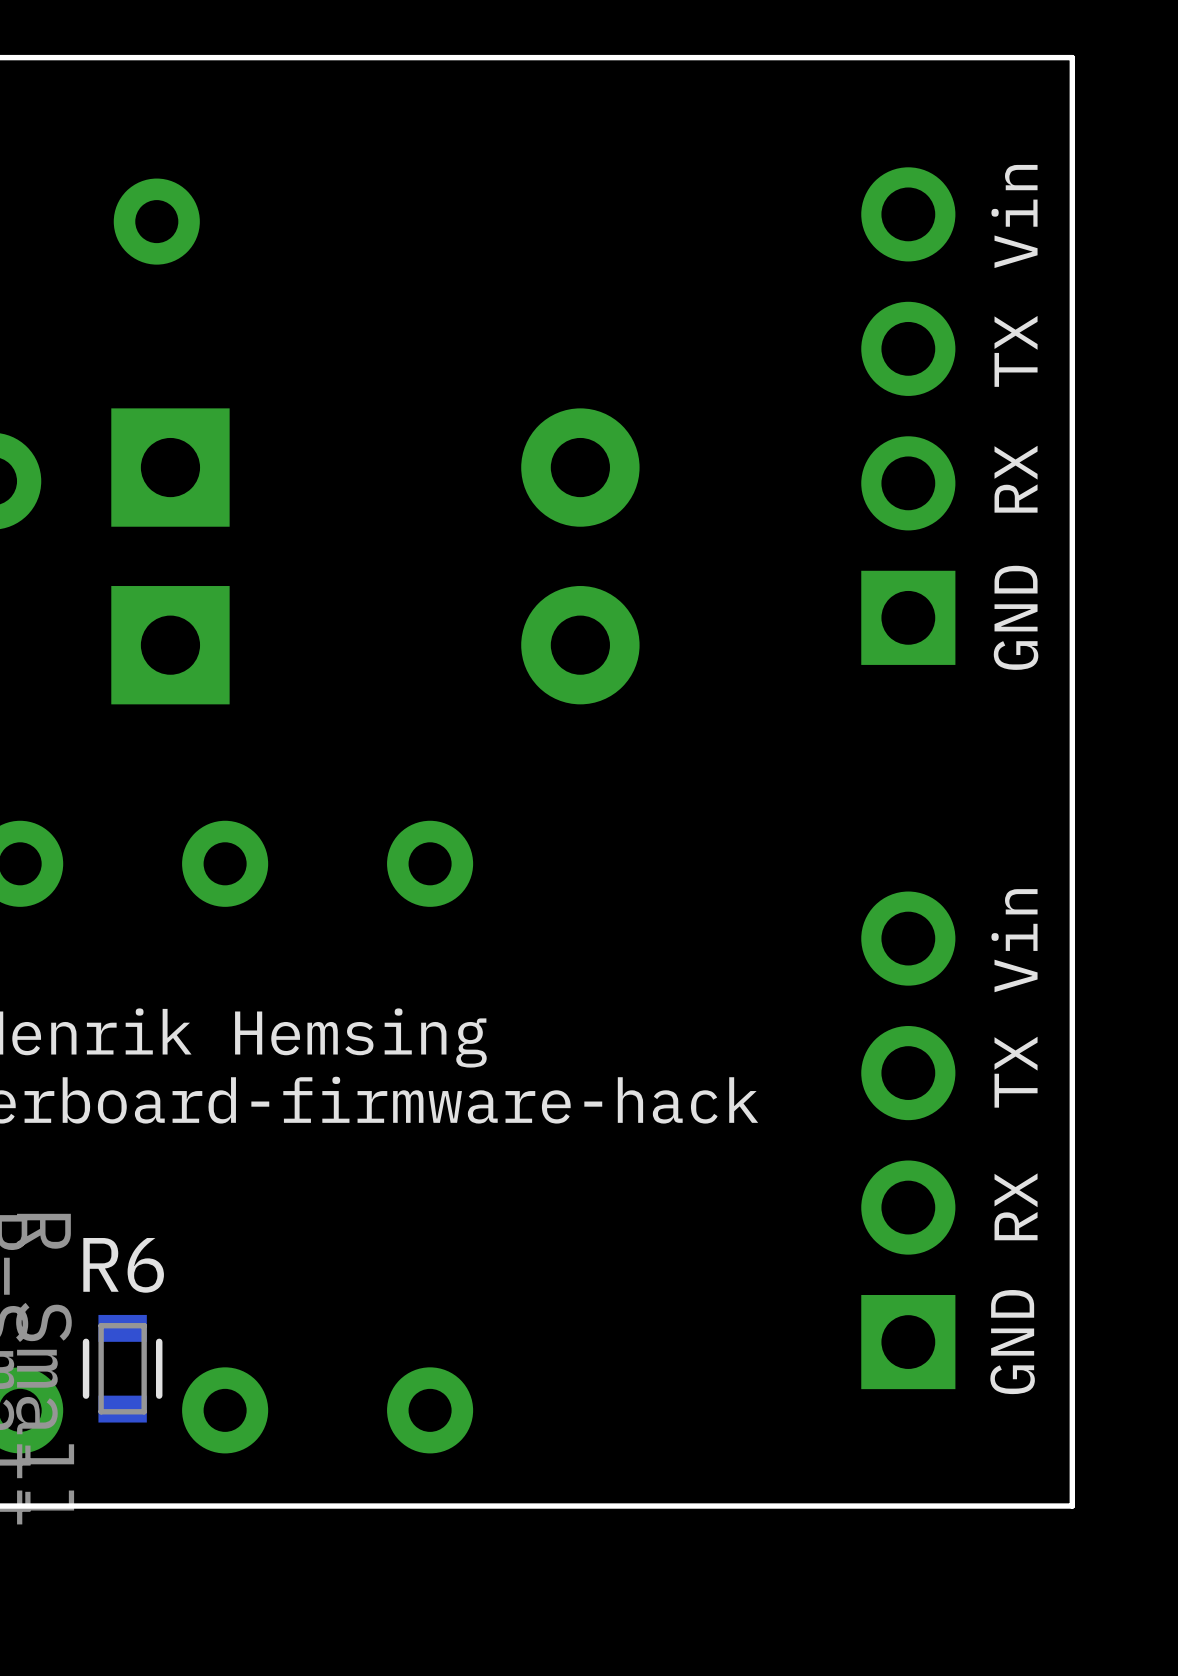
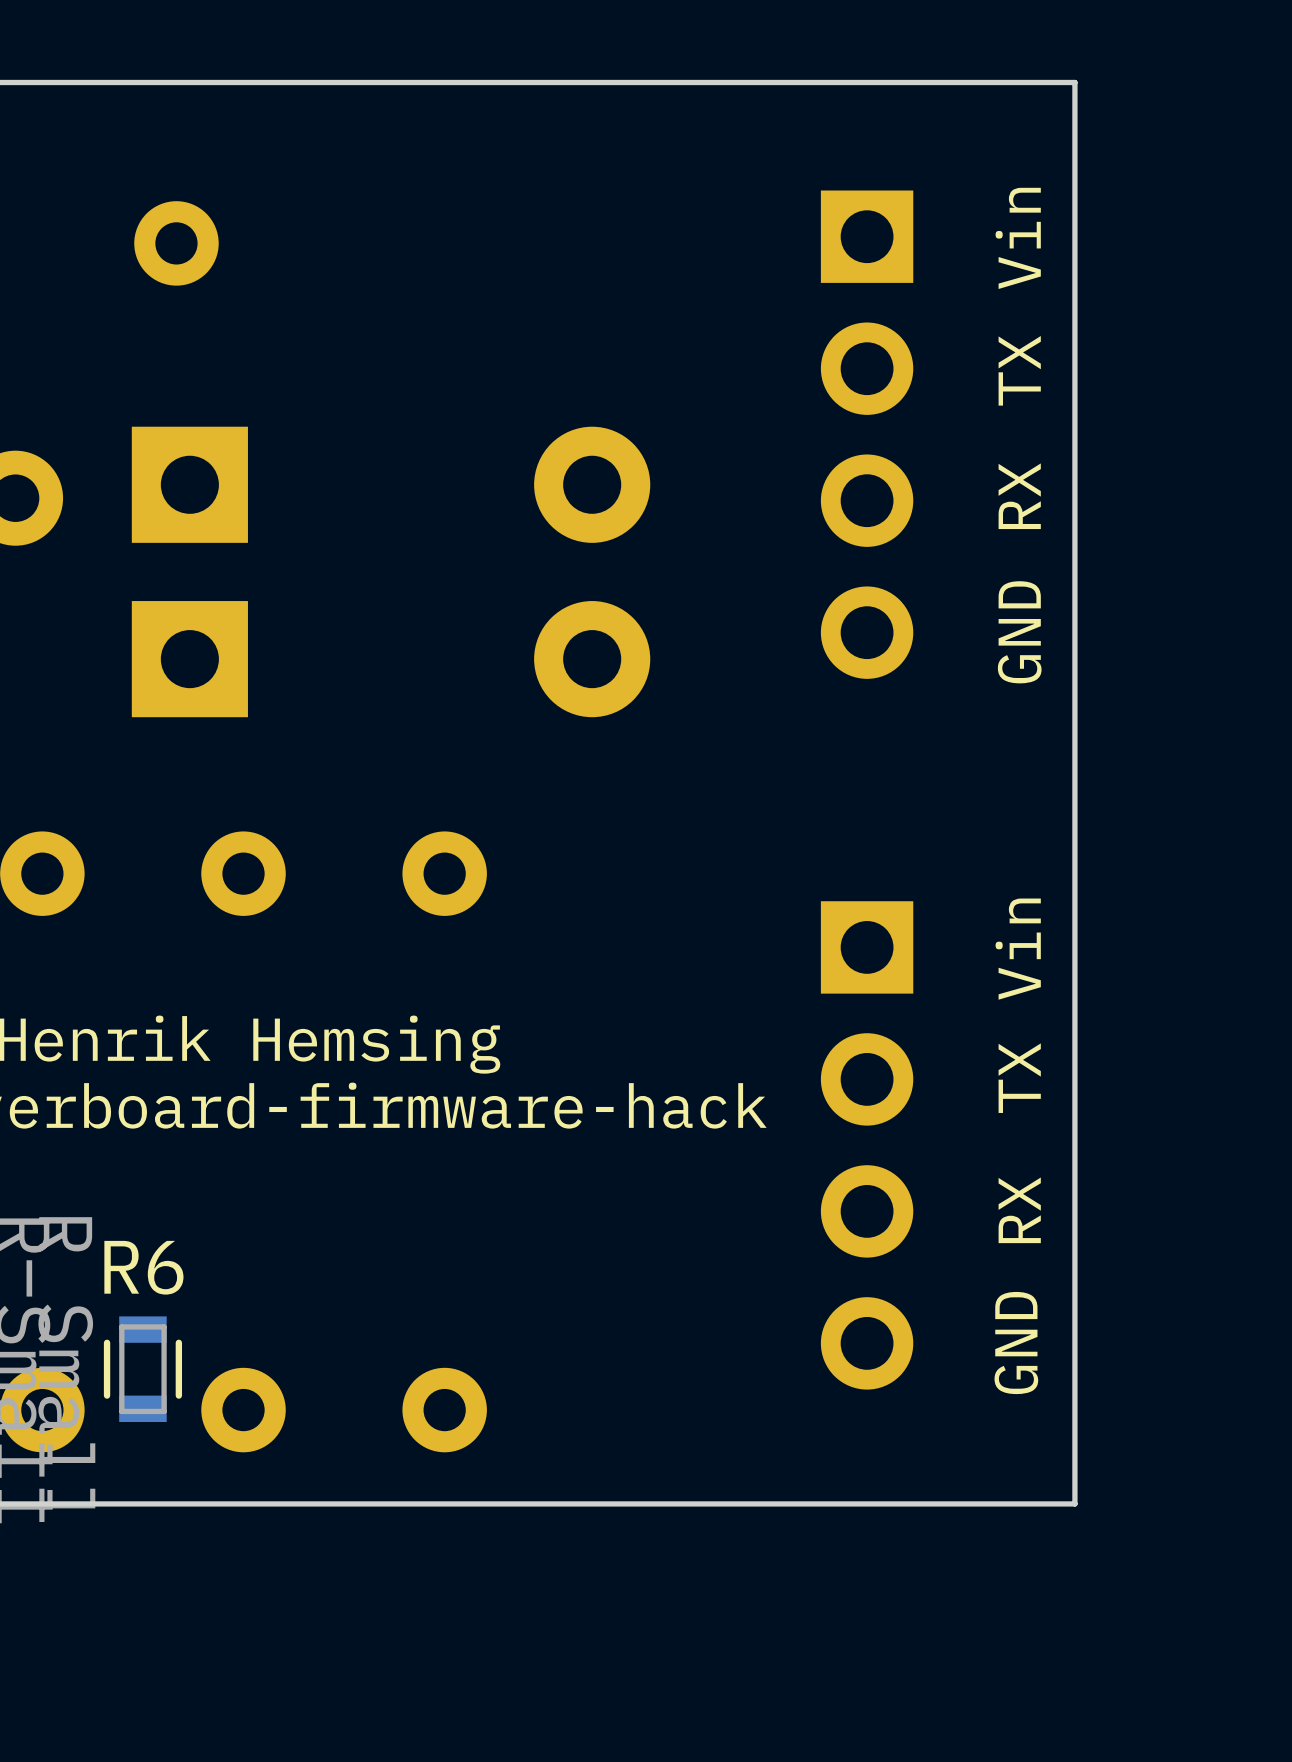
part rotation: 0° (908, 416) -> 180° (867, 434)
part rotation: 0° (908, 1140) -> 180° (867, 1145)

